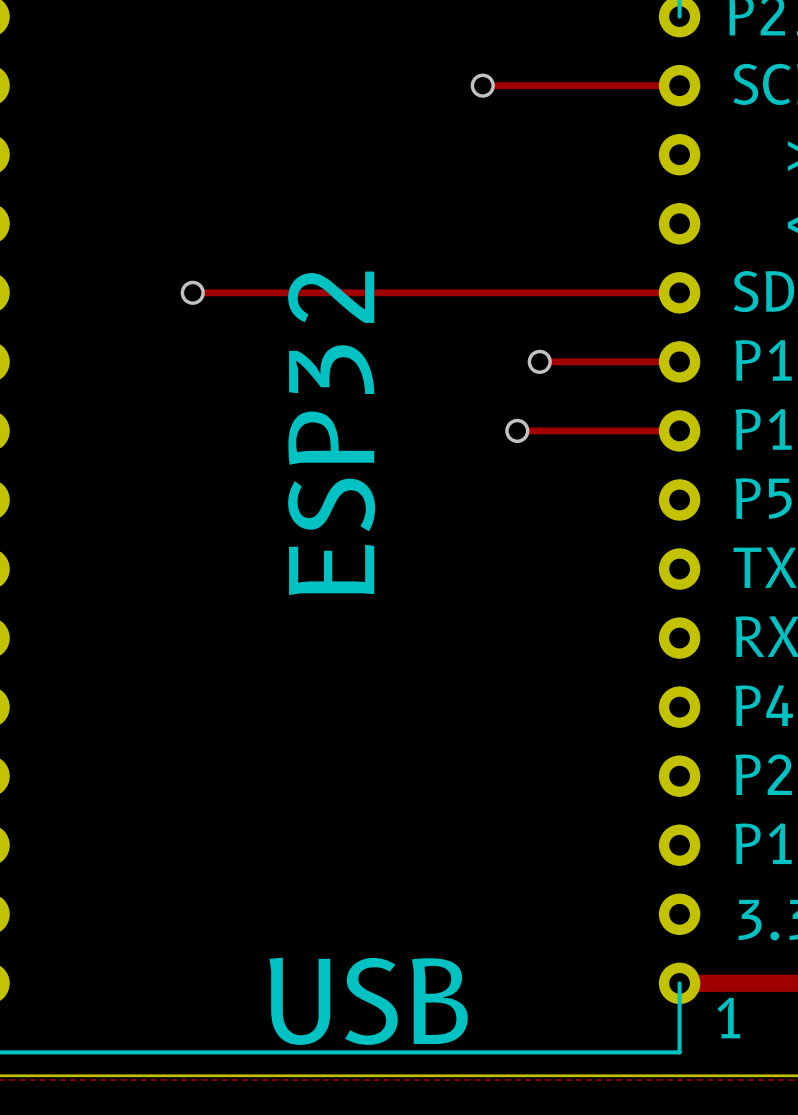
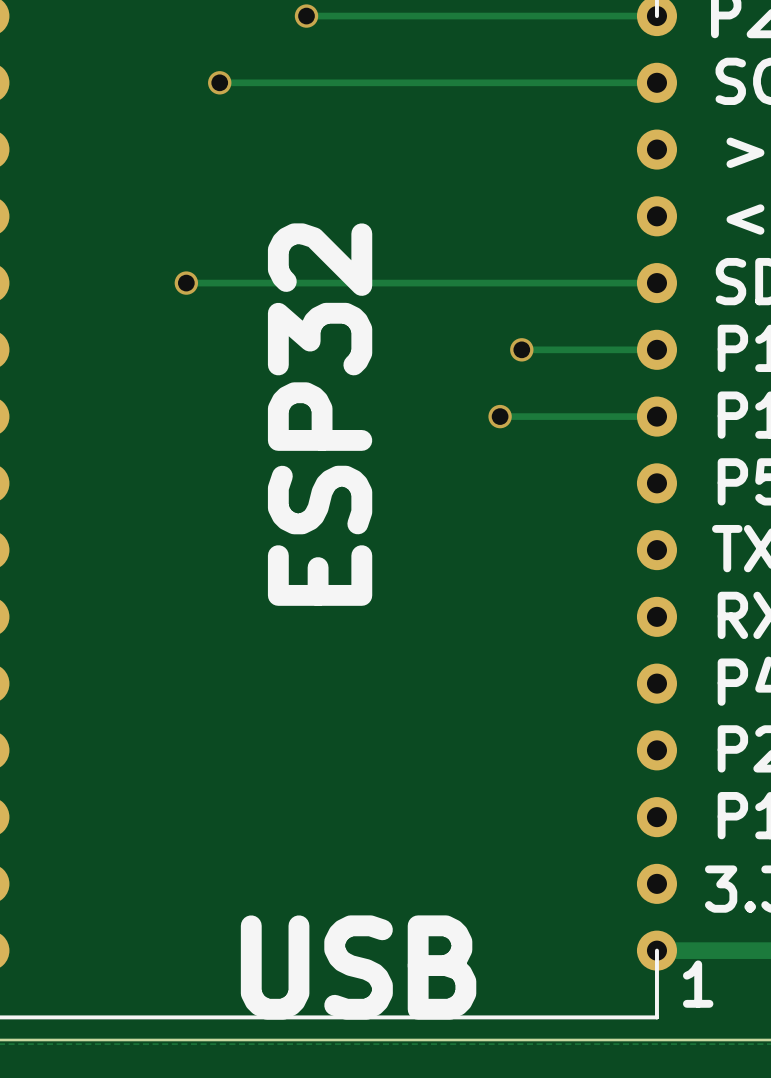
track: none -> (306, 16) (656, 16)
via: none -> (306, 16)
track: none -> (219, 82) (466, 82)
via: none -> (219, 82)
via: (482, 85) -> none

